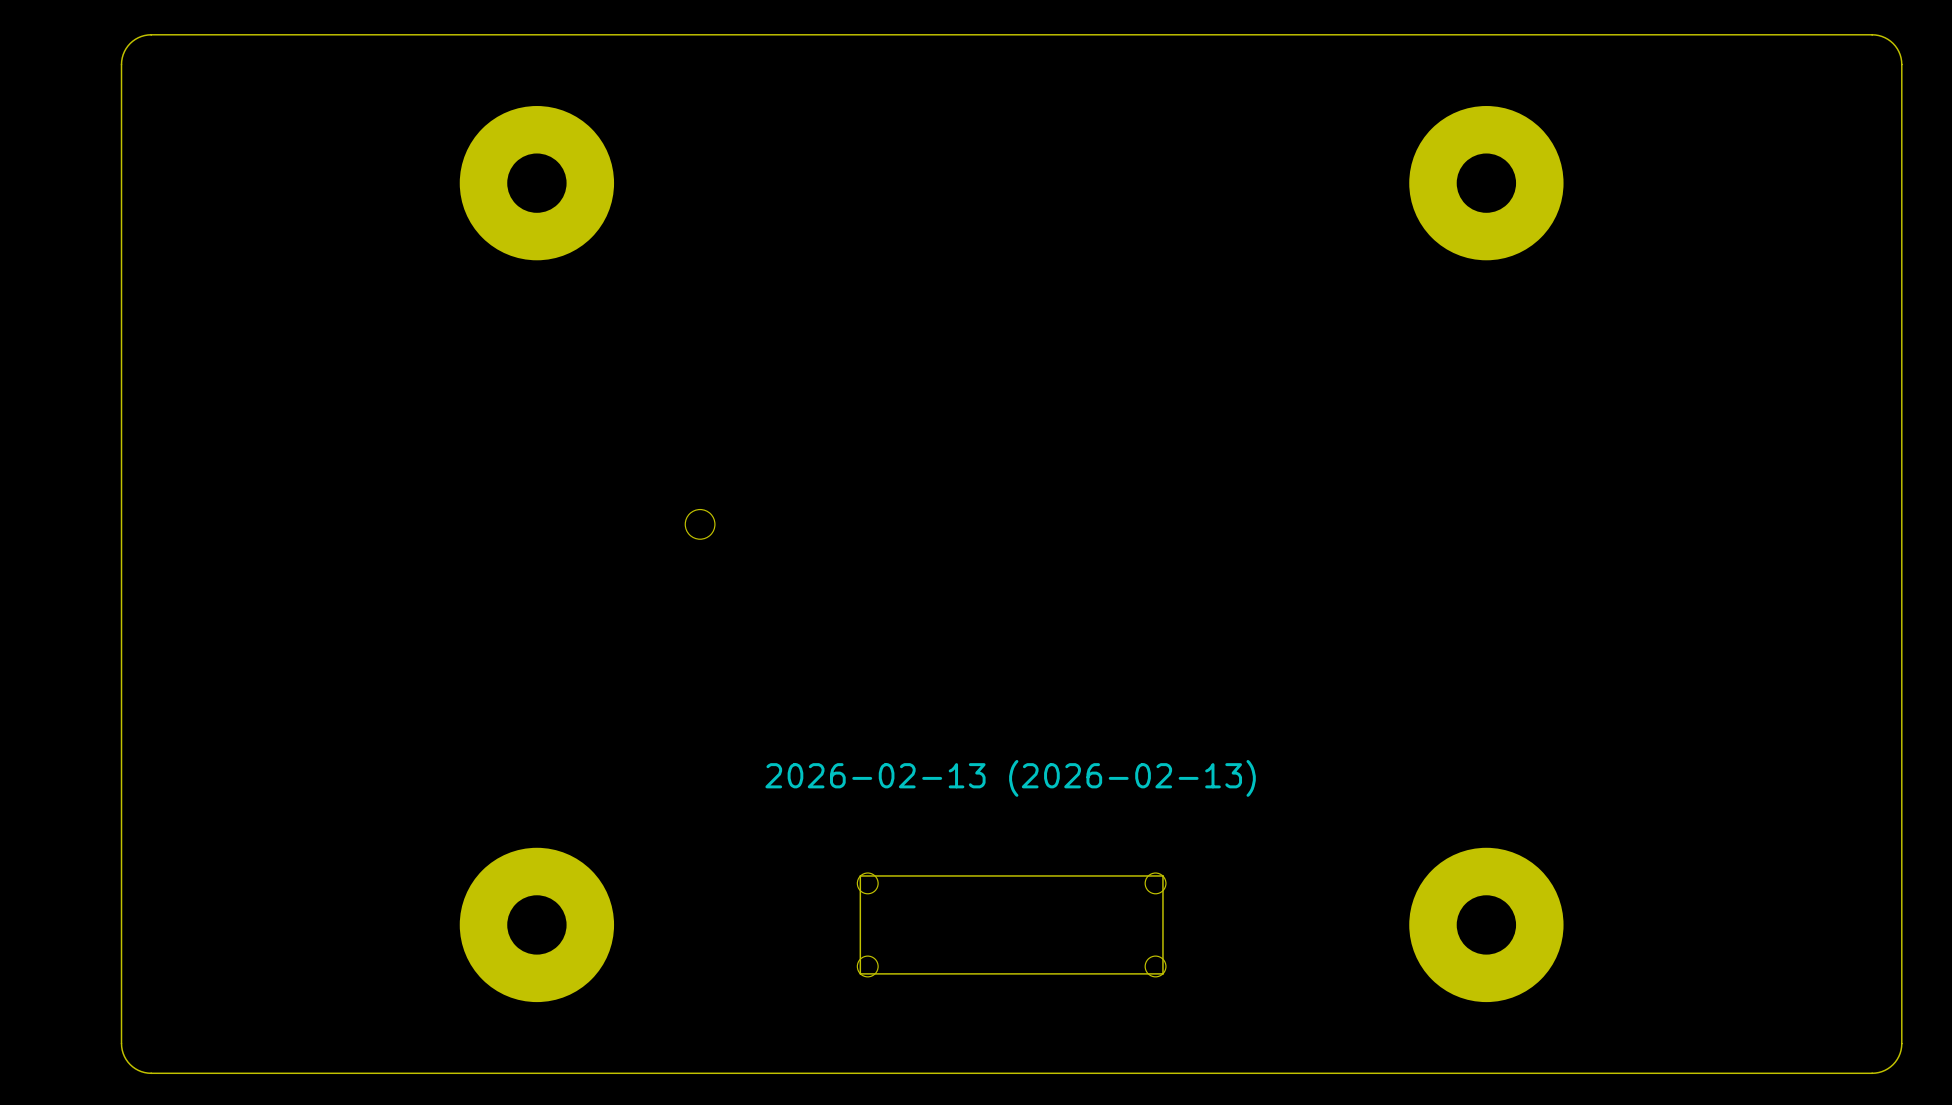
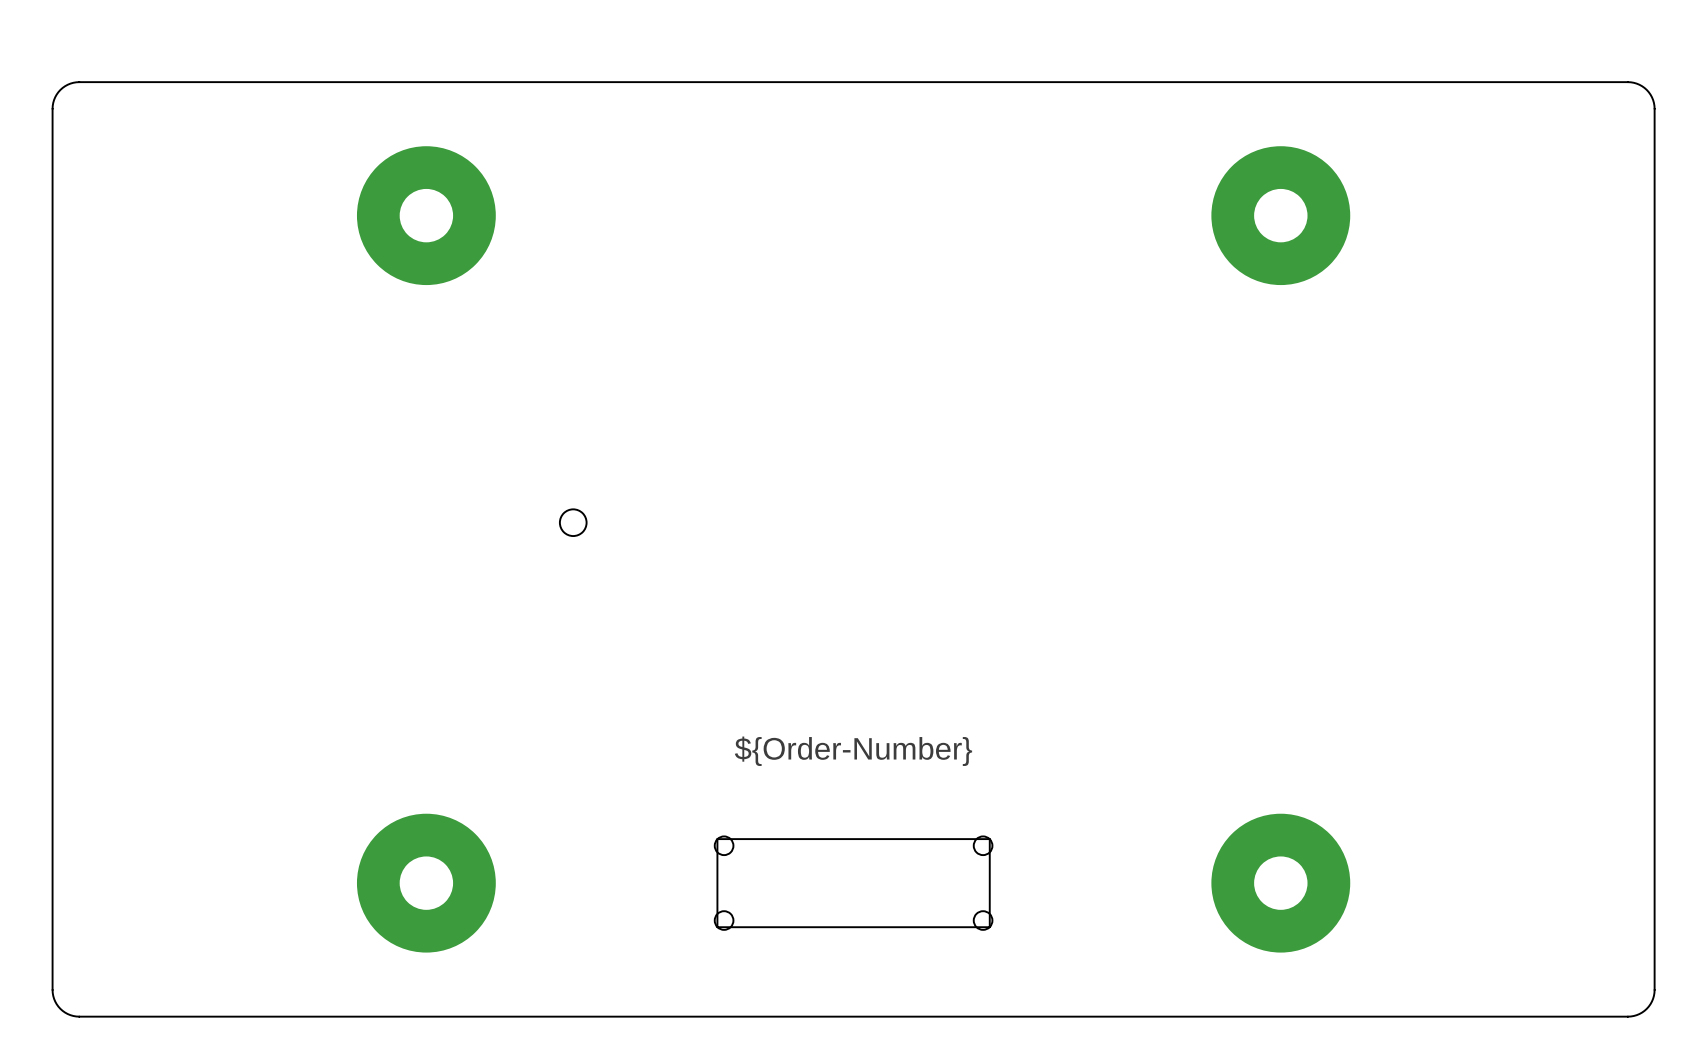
drawing shape: [765, 759, 1256, 797] -> [734, 736, 973, 766]

